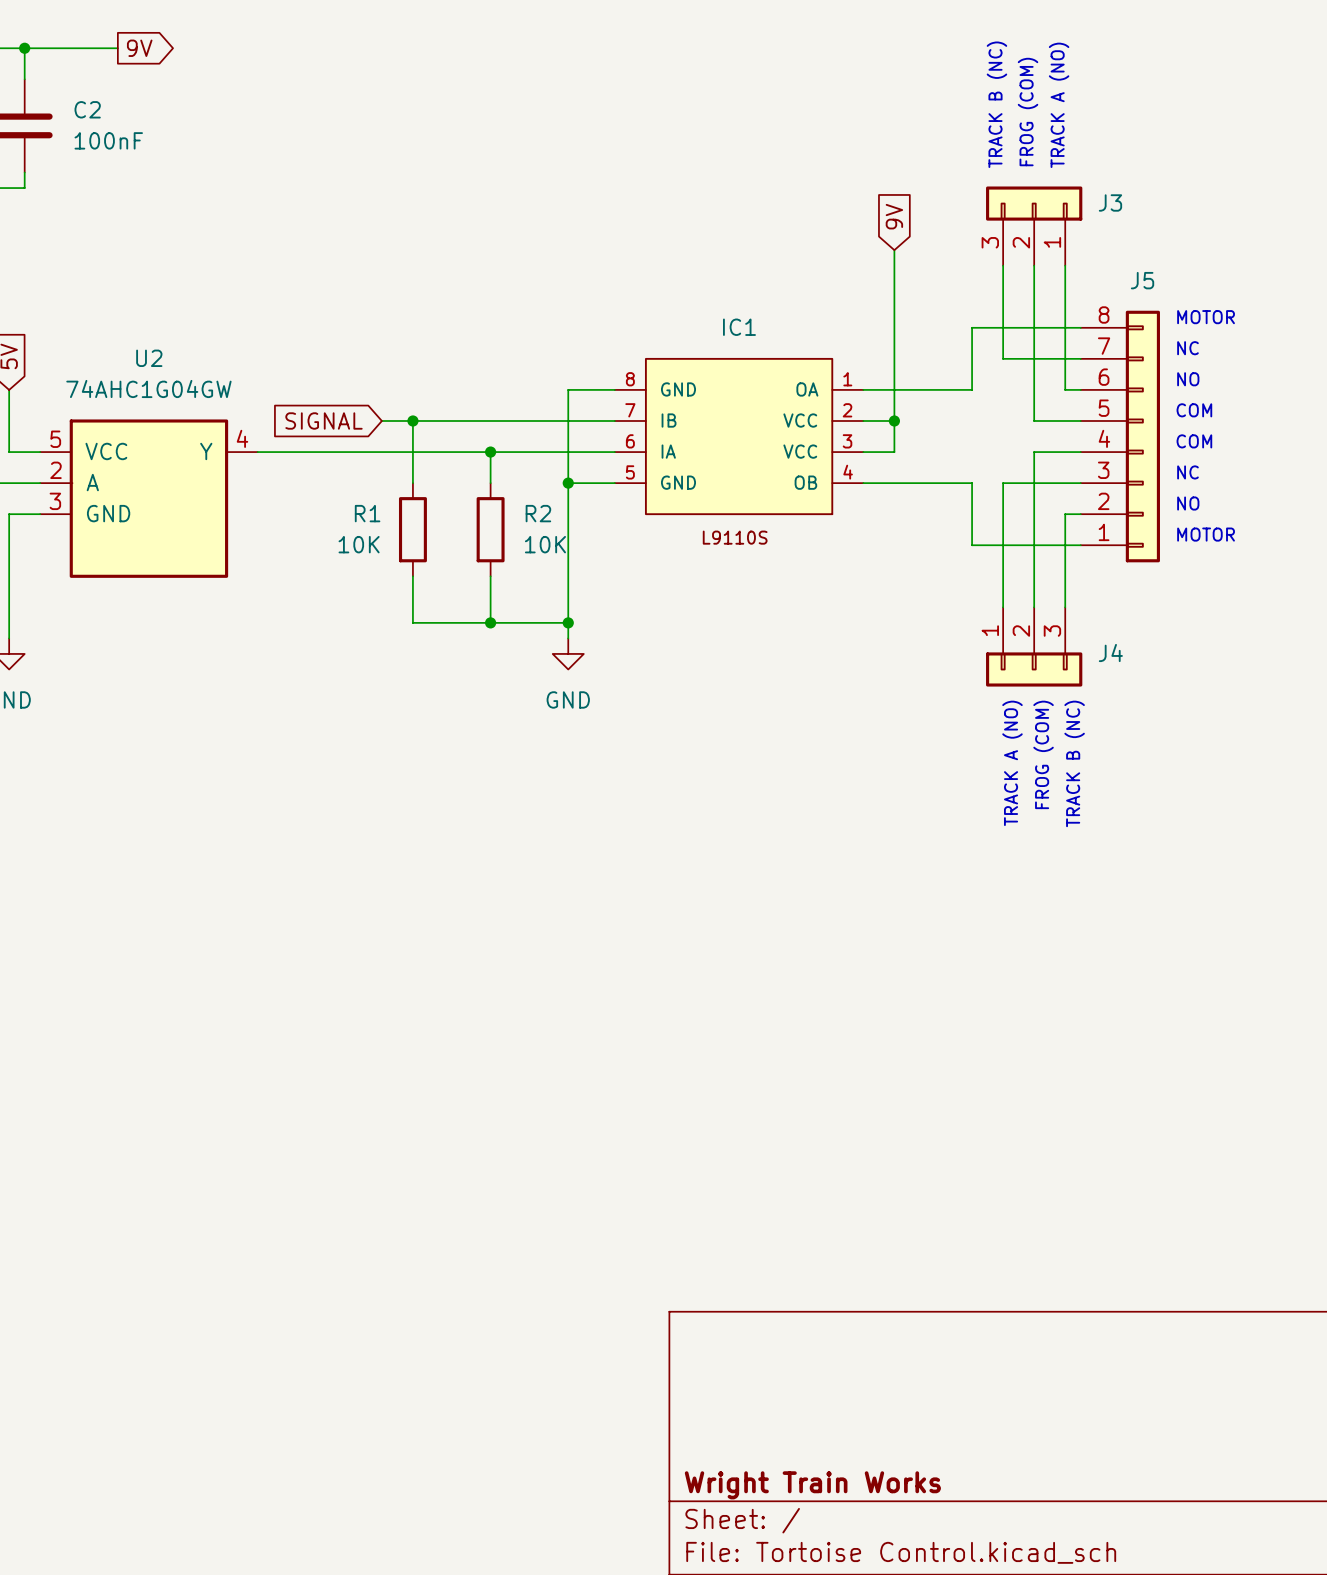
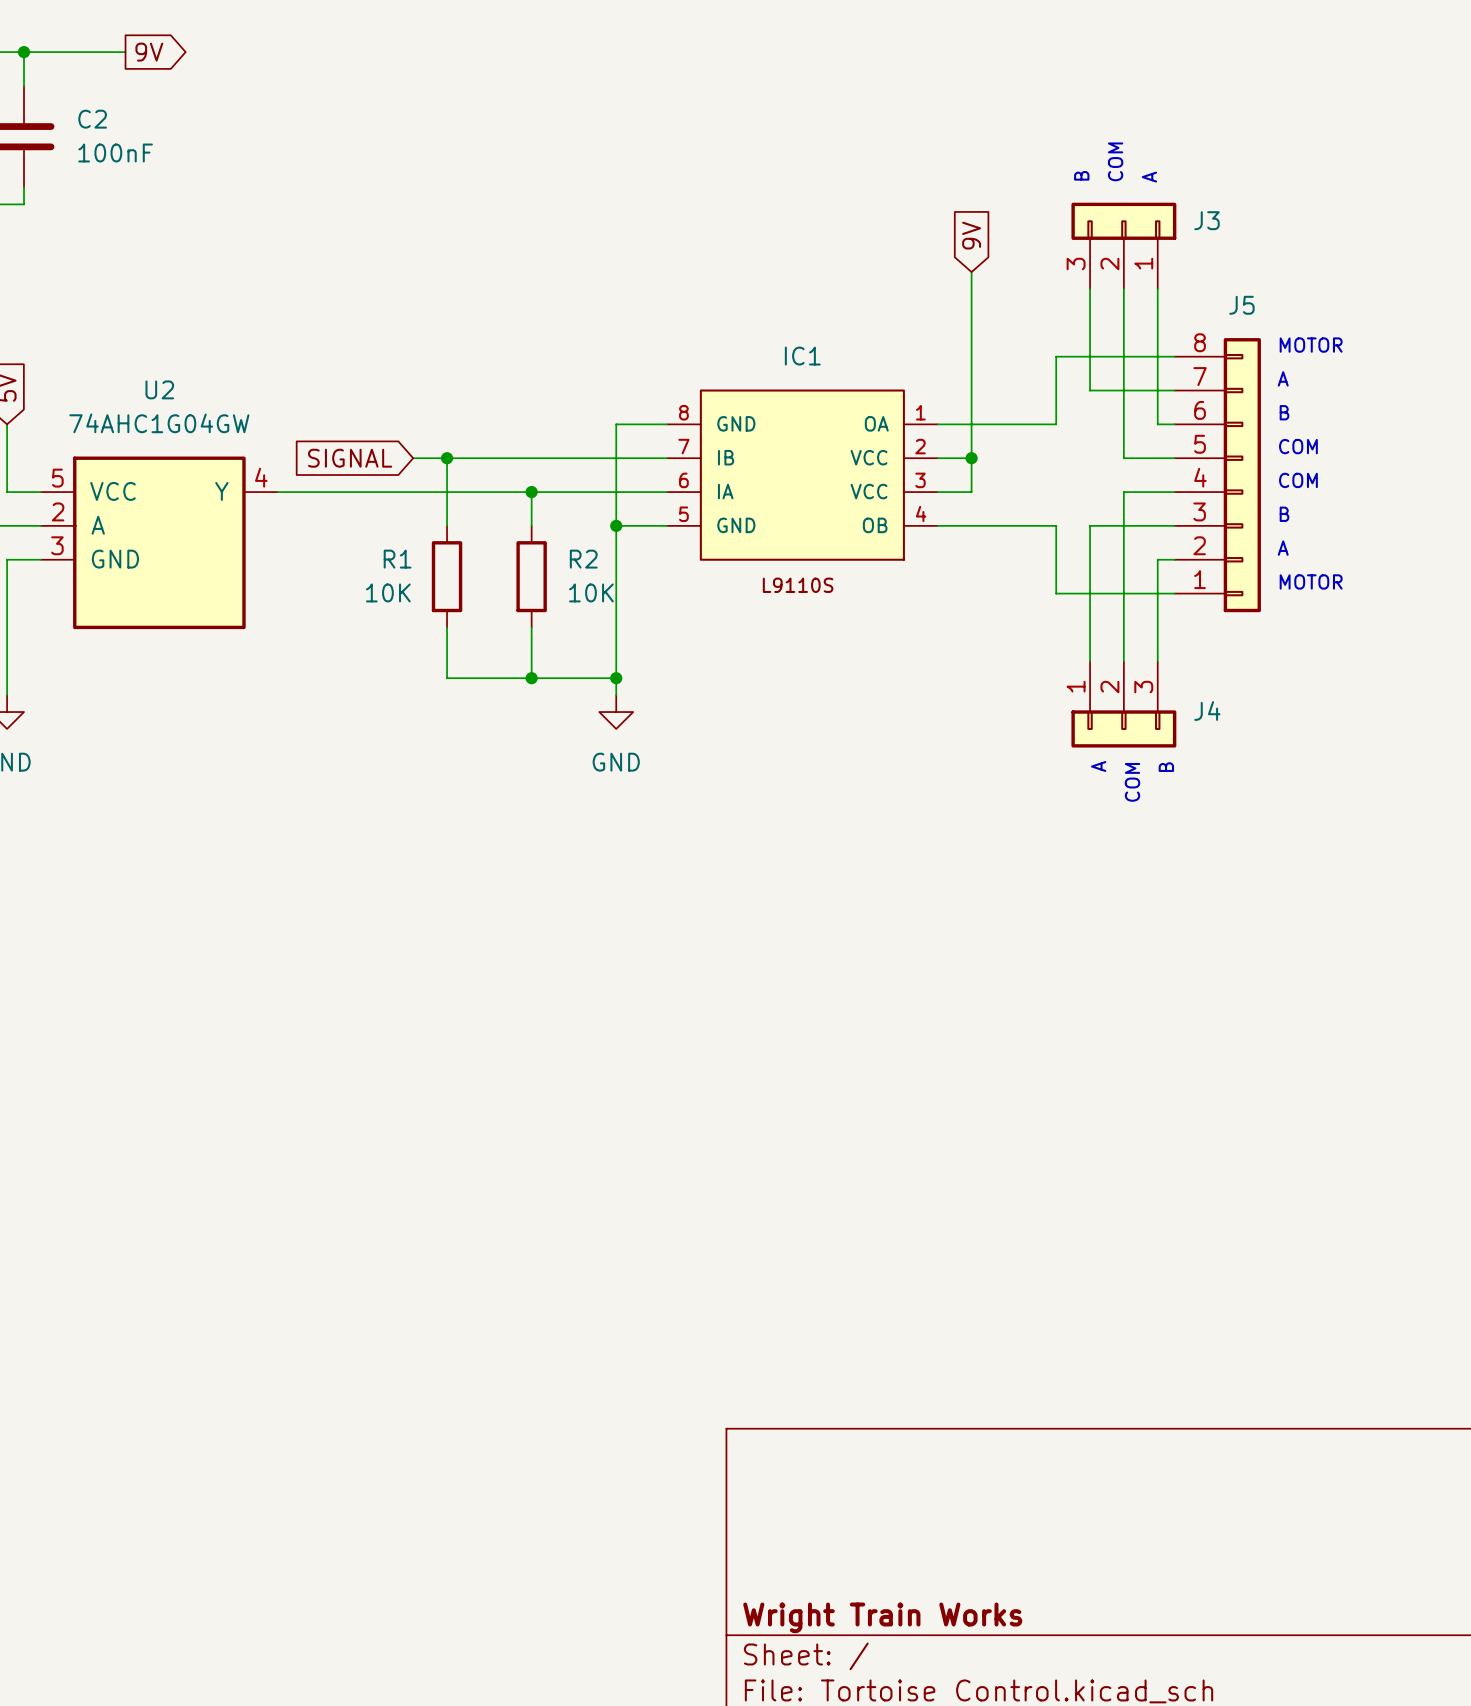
text: TRACK B (NC) (996, 104) -> B (1081, 175)
text: TRACK A (NO) (1059, 105) -> A (1149, 177)
text: FROG (COM) (1028, 112) -> COM (1115, 161)
text: NC (1187, 348) -> A (1283, 378)
text: NO (1188, 379) -> B (1284, 412)
text: NC (1187, 472) -> B (1284, 514)
text: NO (1188, 503) -> A (1283, 548)
text: FROG (COM) (1043, 754) -> COM (1132, 782)
text: TRACK A (NO) (1012, 763) -> A (1098, 766)
text: TRACK B (NC) (1074, 763) -> B (1166, 767)

